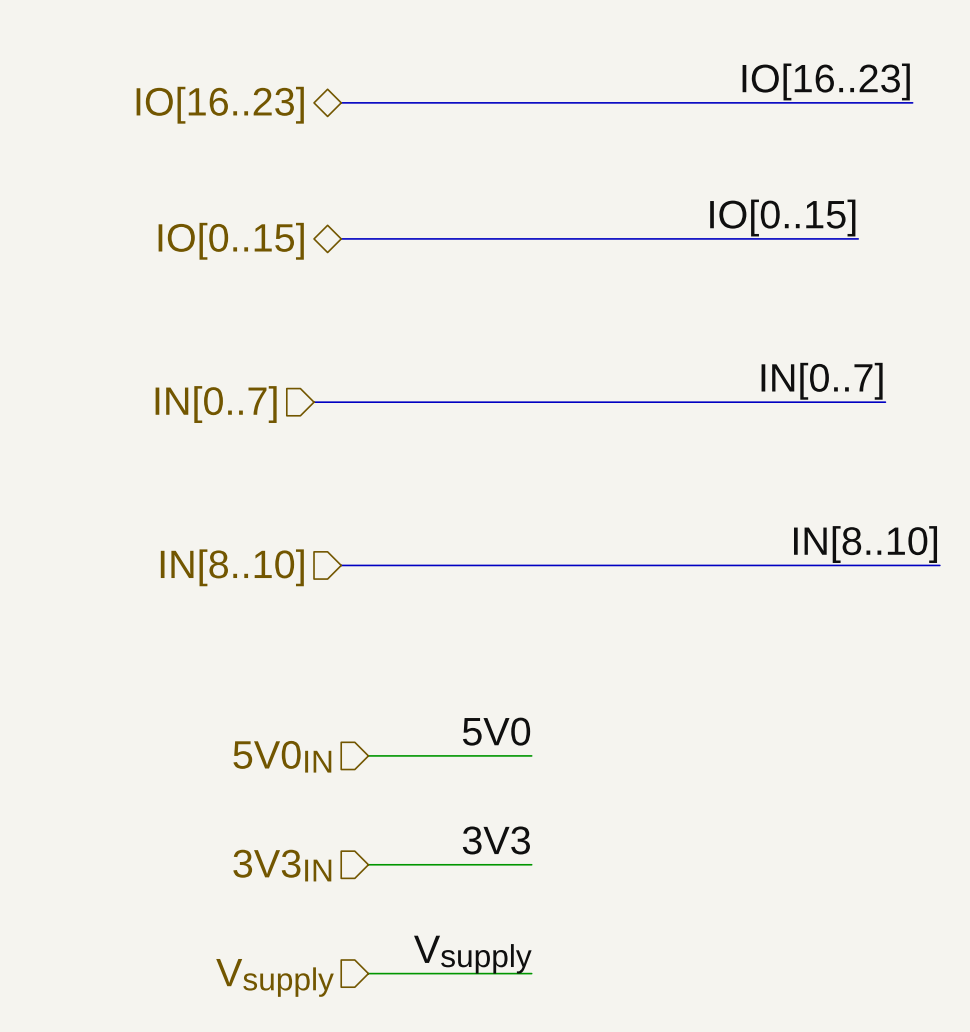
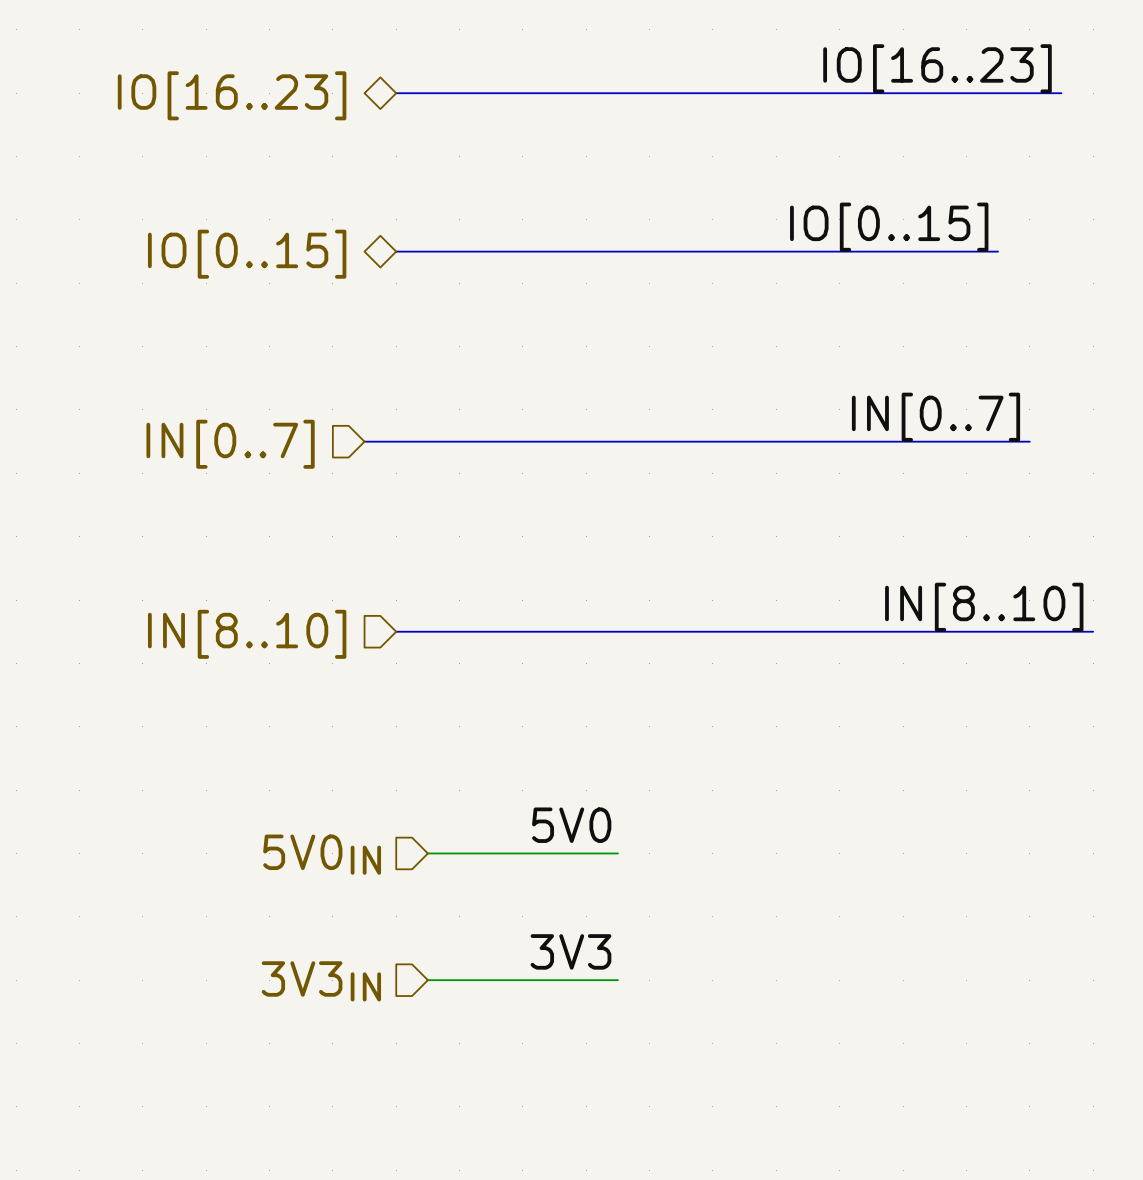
label: Vsupply (472, 954) -> none
wire: (368, 973) (531, 973) -> none
hierarchical label: Vsupply (275, 977) -> none

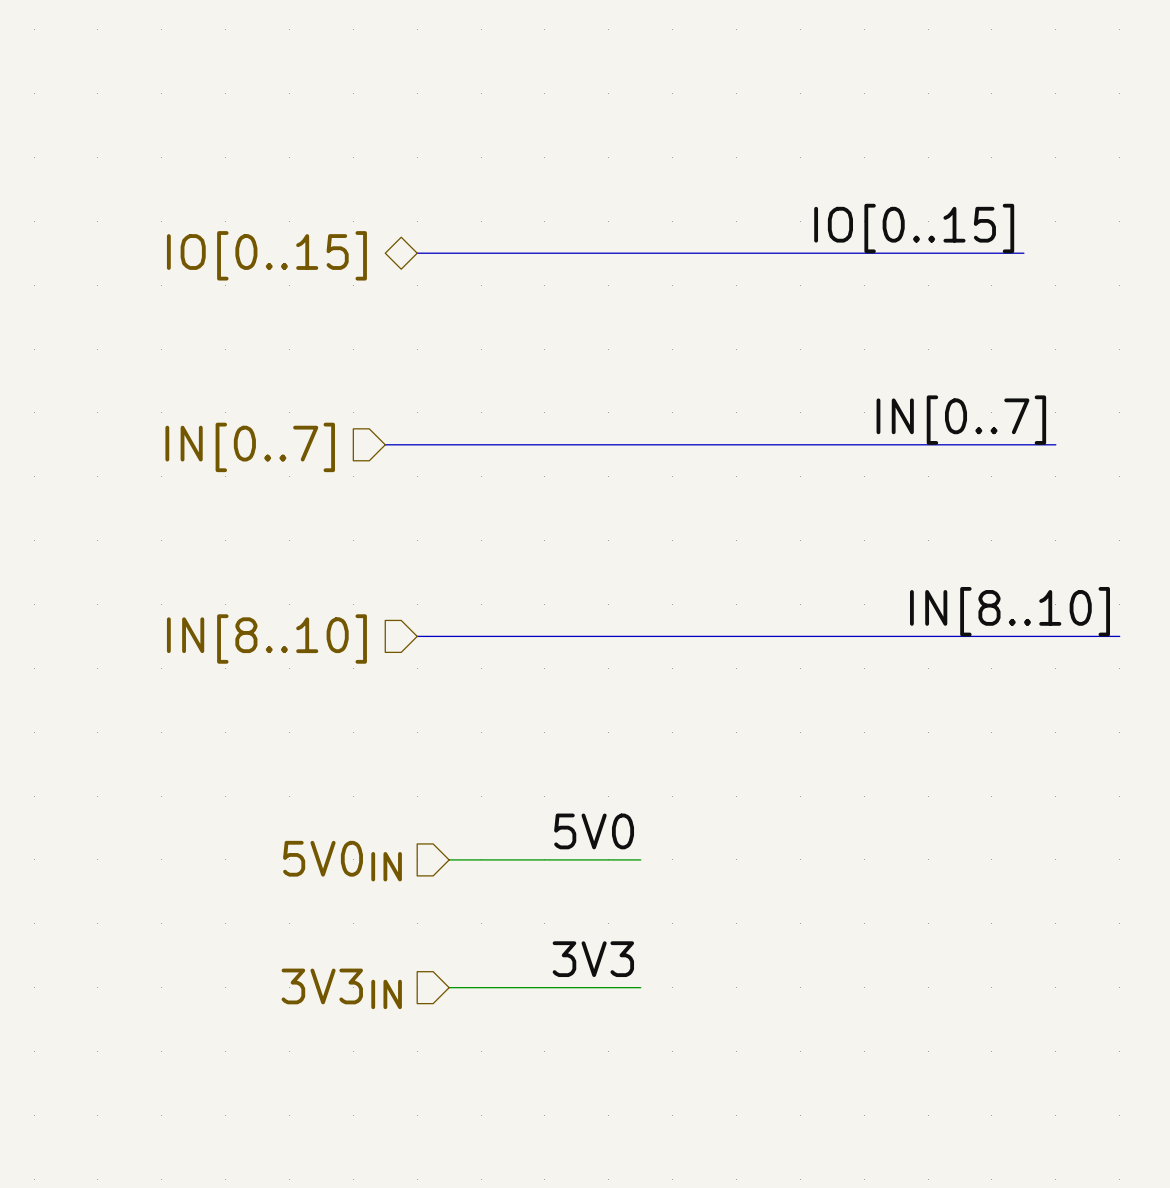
label: IO[16..23] (937, 68) -> none
bus: (396, 93) (1061, 93) -> none
hierarchical label: IO[16..23] (232, 95) -> none

